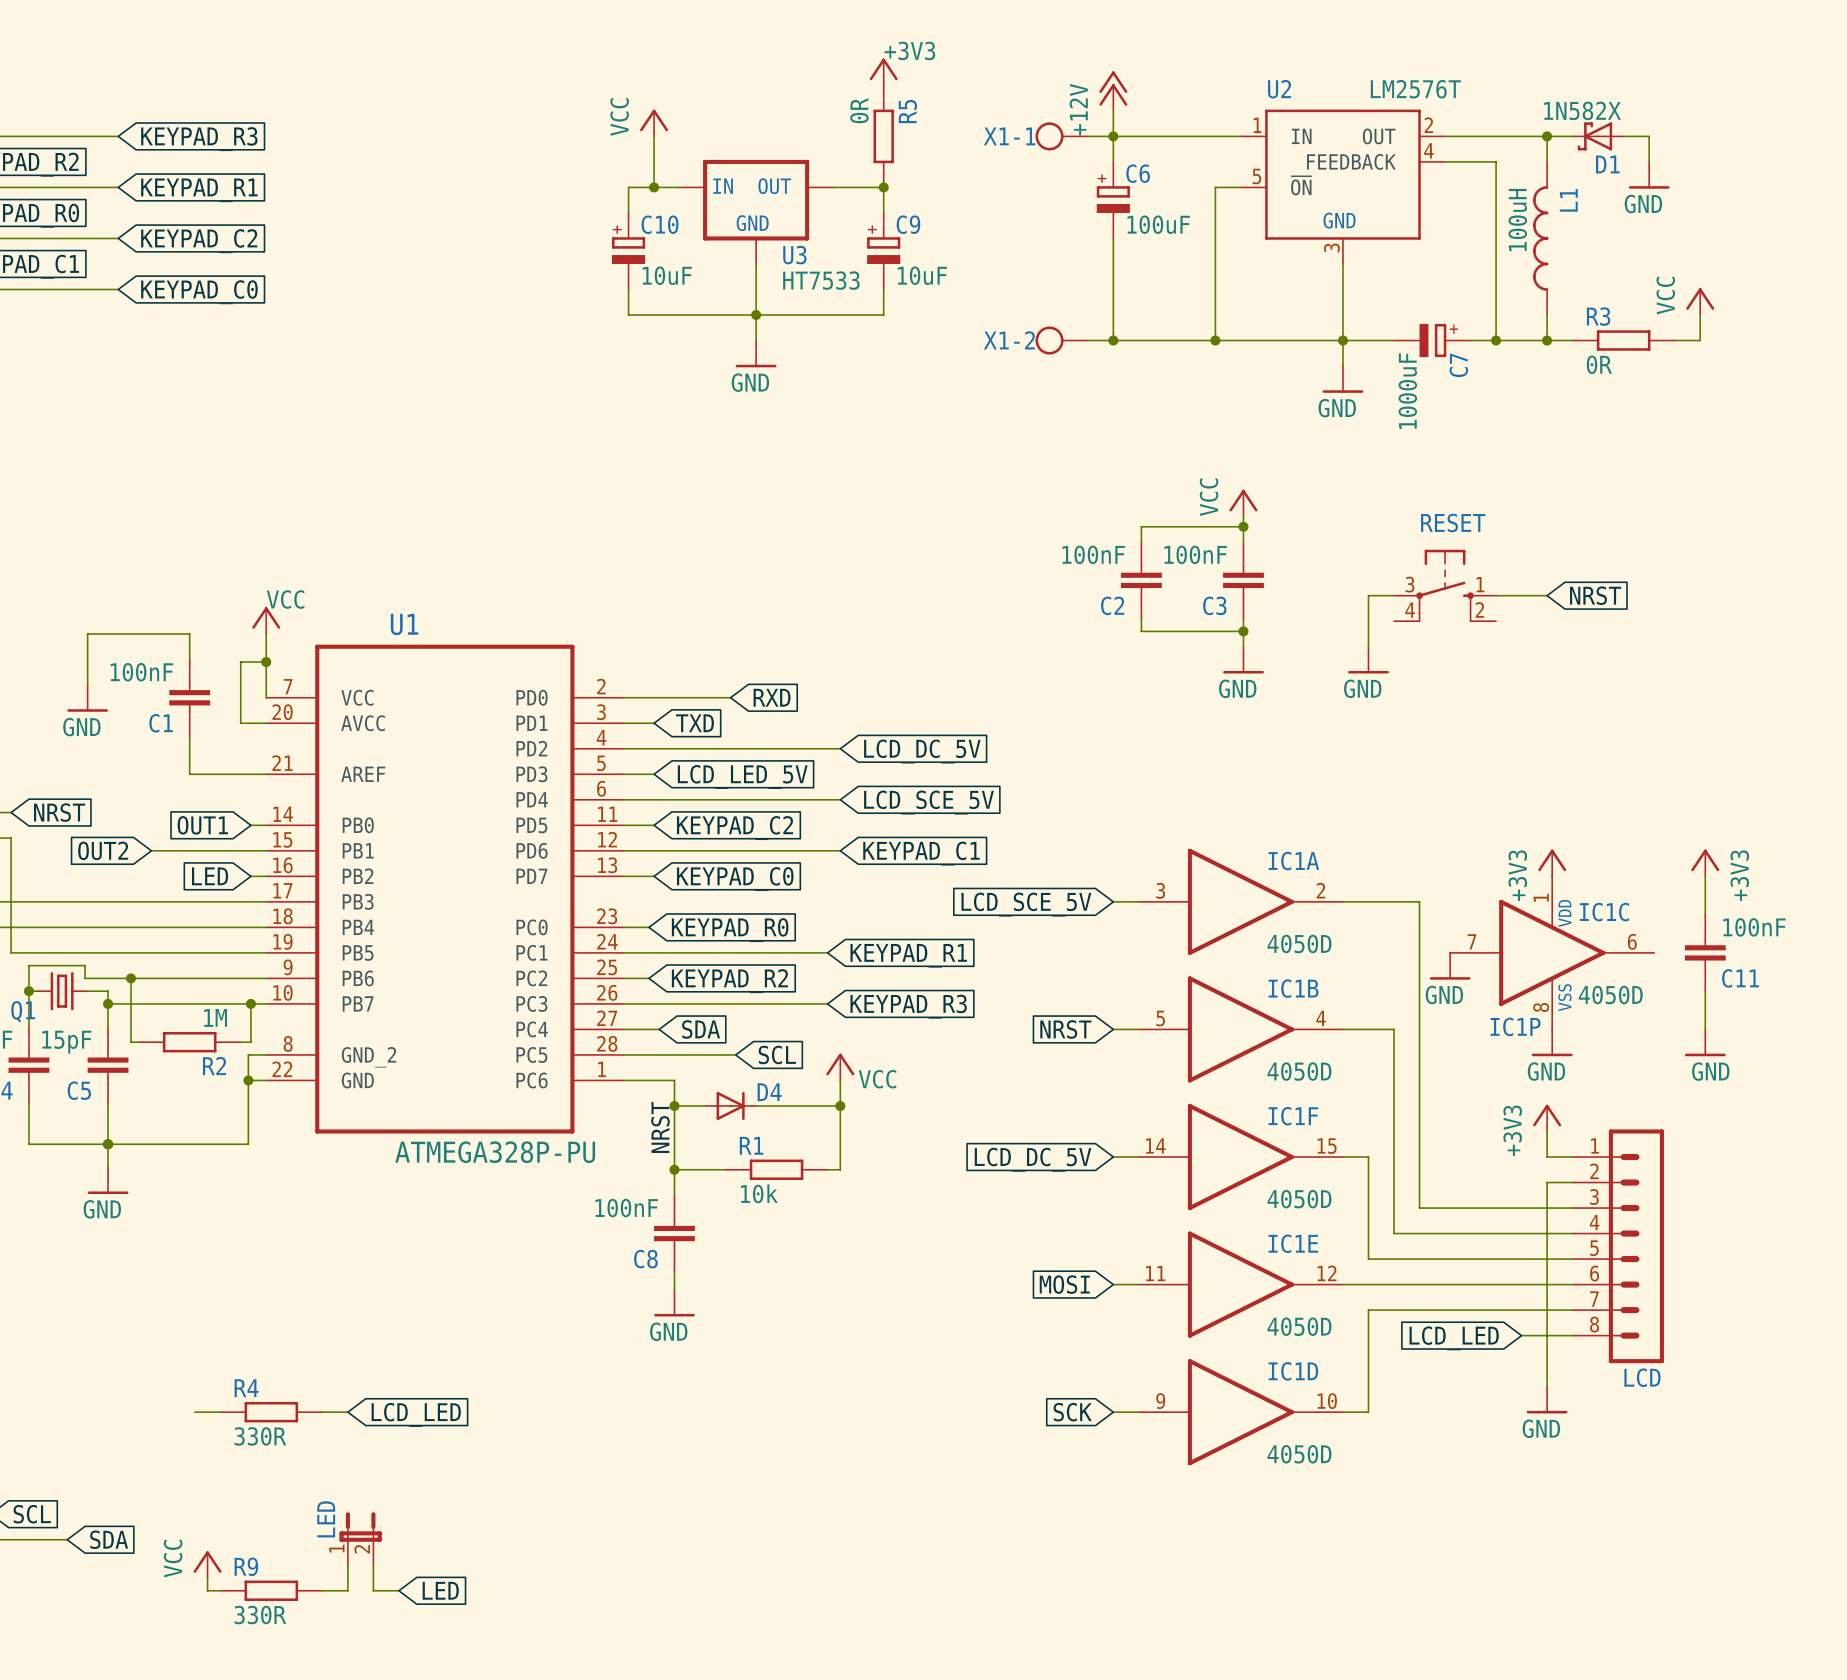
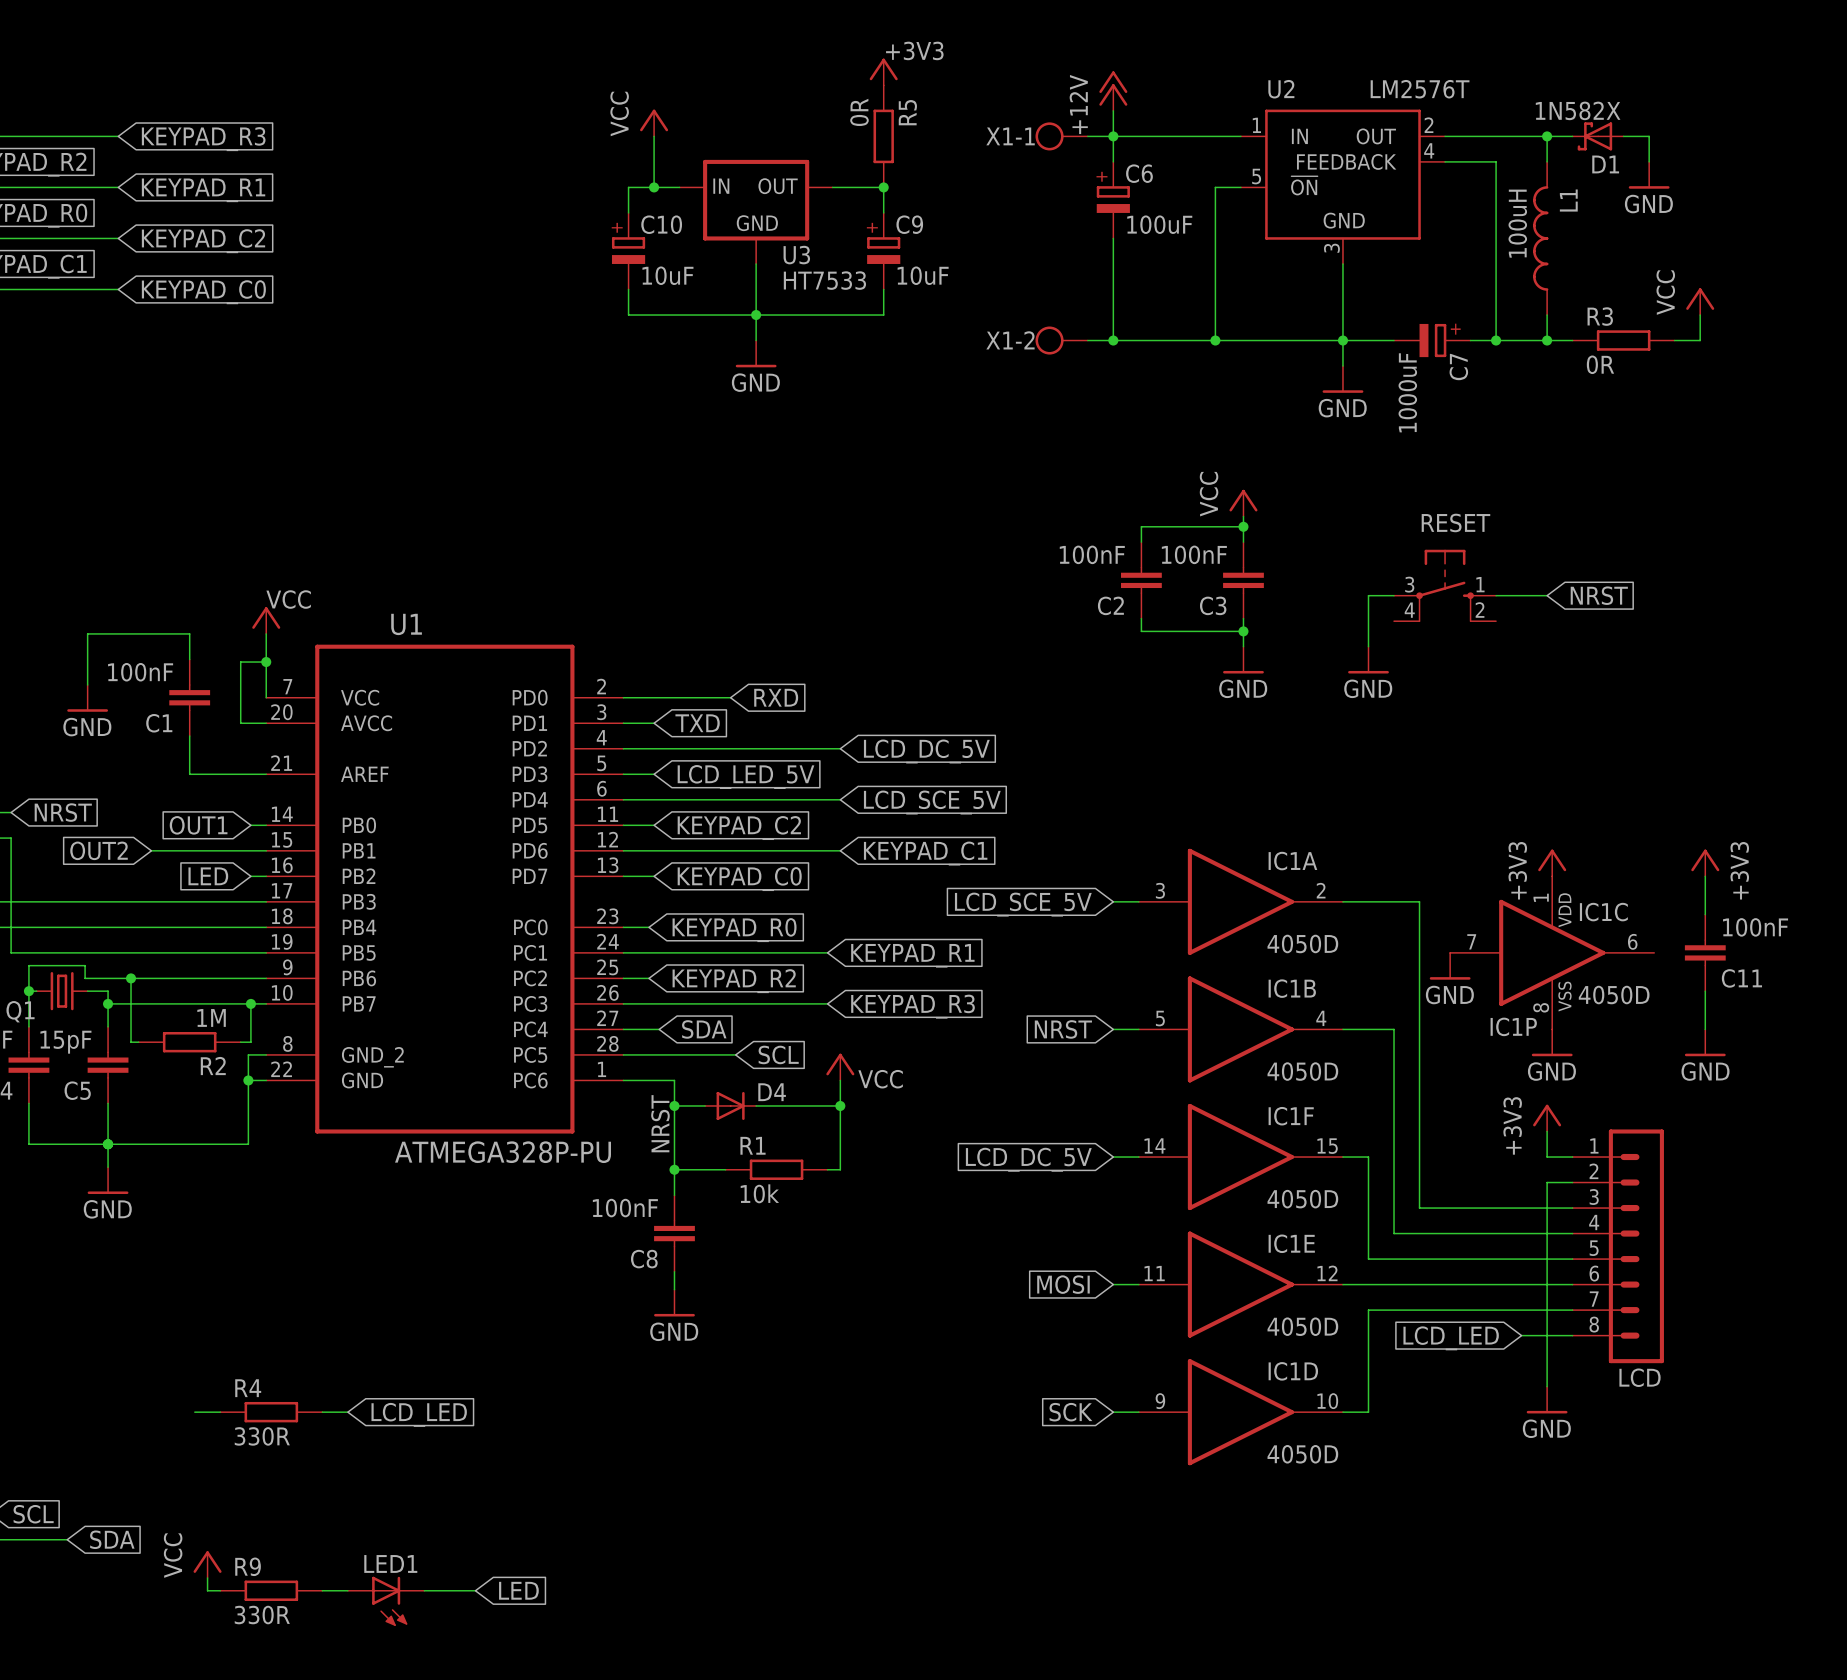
LED: (360, 1538) -> none
wire: (347, 1565) (347, 1590) -> none
wire: none -> (424, 1590) (475, 1590)
global label position: LED (440, 1590) -> LED (518, 1590)
LED1: none -> (386, 1601)

